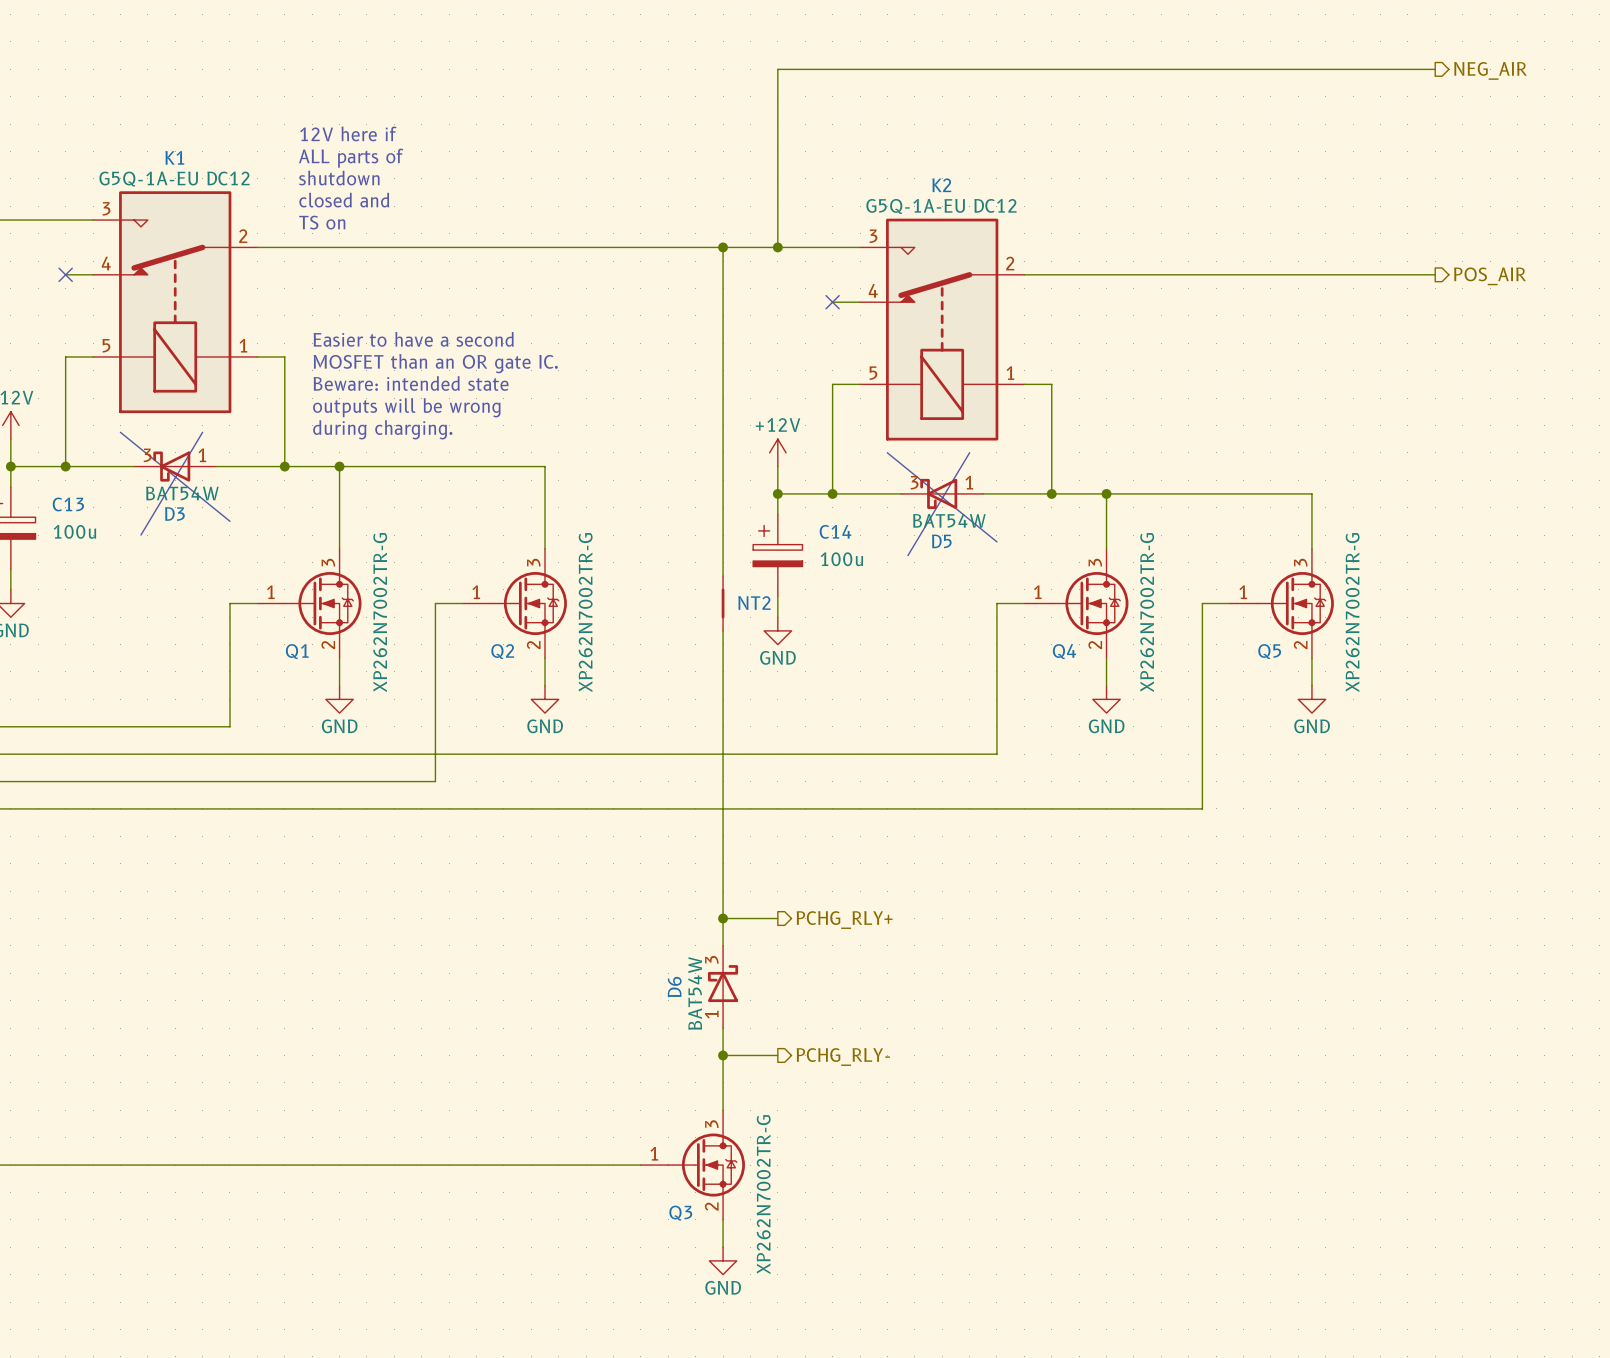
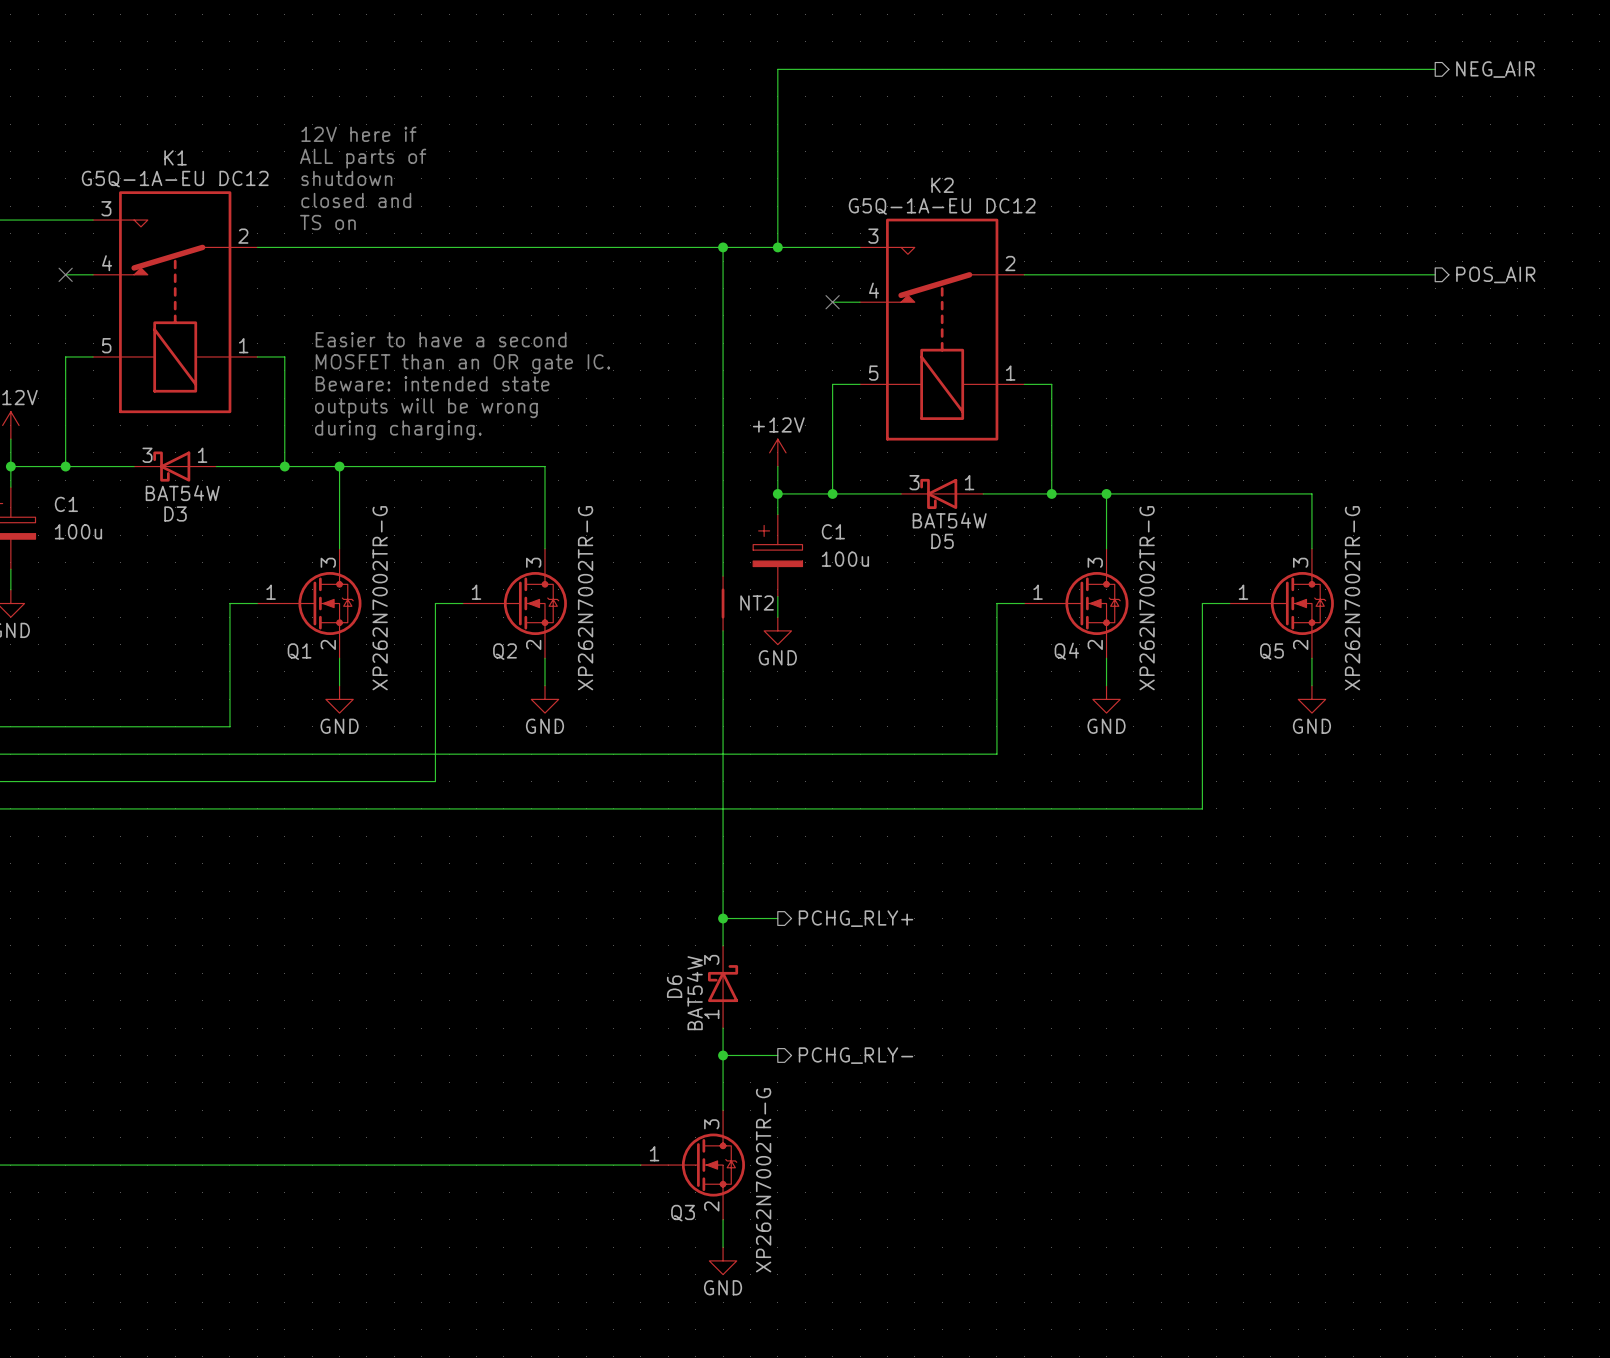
line: (120, 432) (229, 521) -> none
line: (202, 432) (140, 535) -> none
line: (887, 452) (996, 541) -> none
line: (969, 452) (907, 555) -> none
C13 name: C13 (68, 504) -> C1 (66, 504)
C14 name: C14 (835, 531) -> C1 (833, 531)

